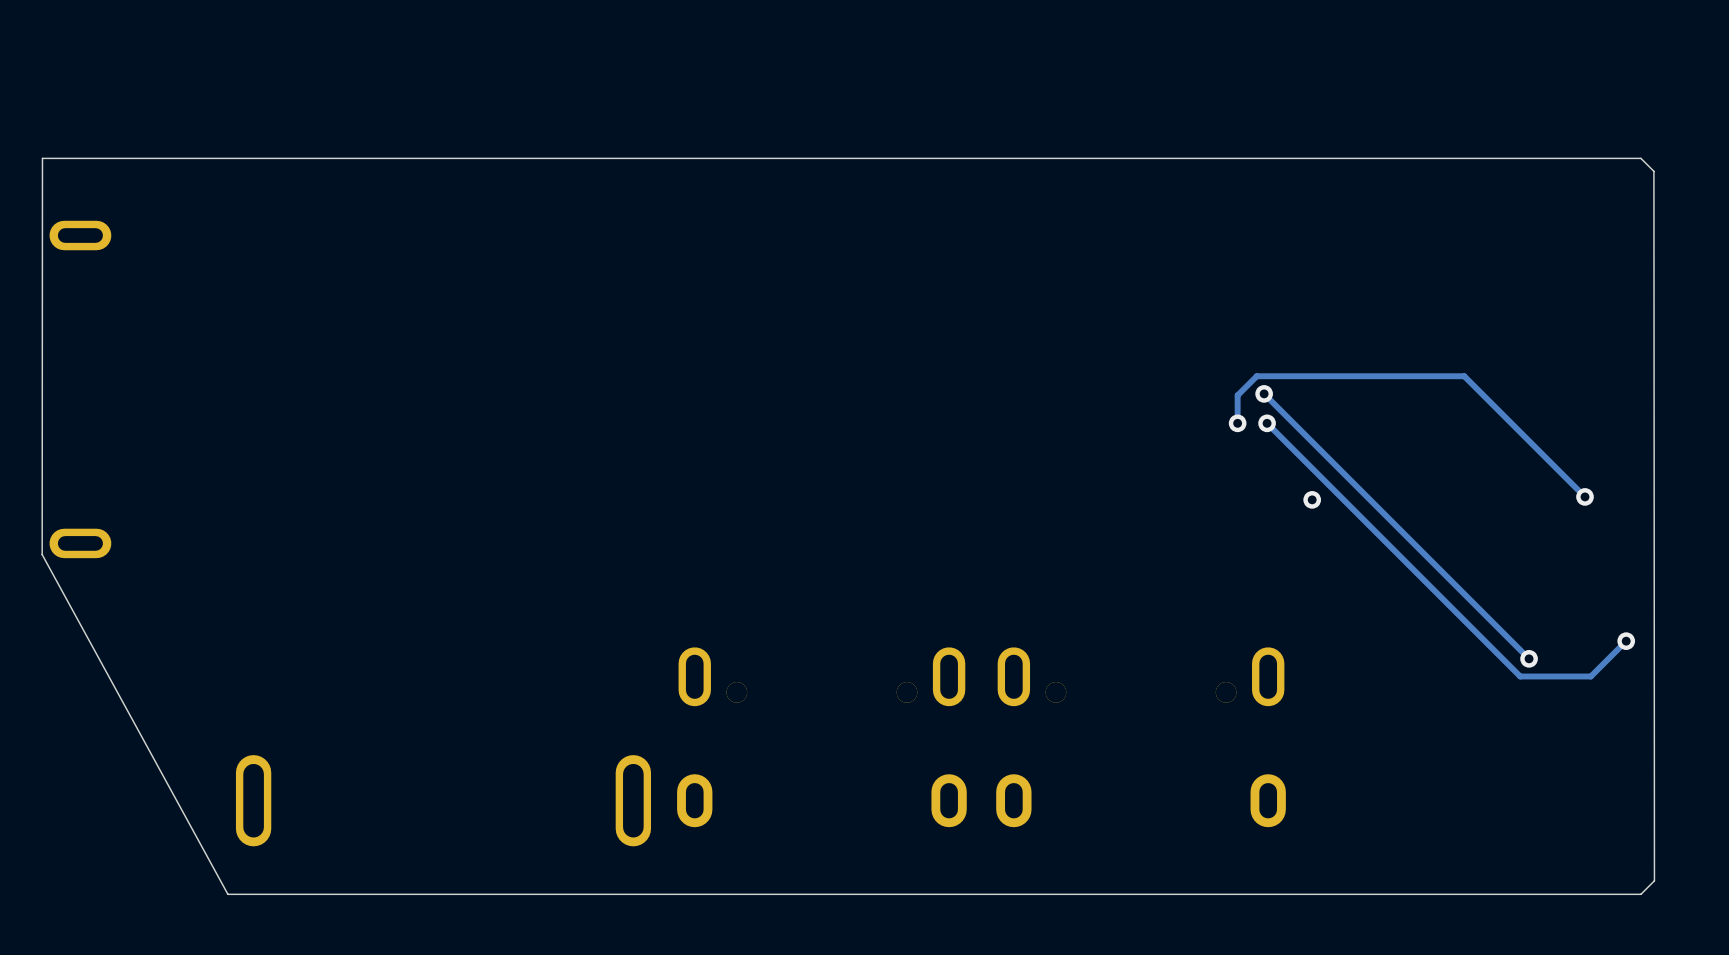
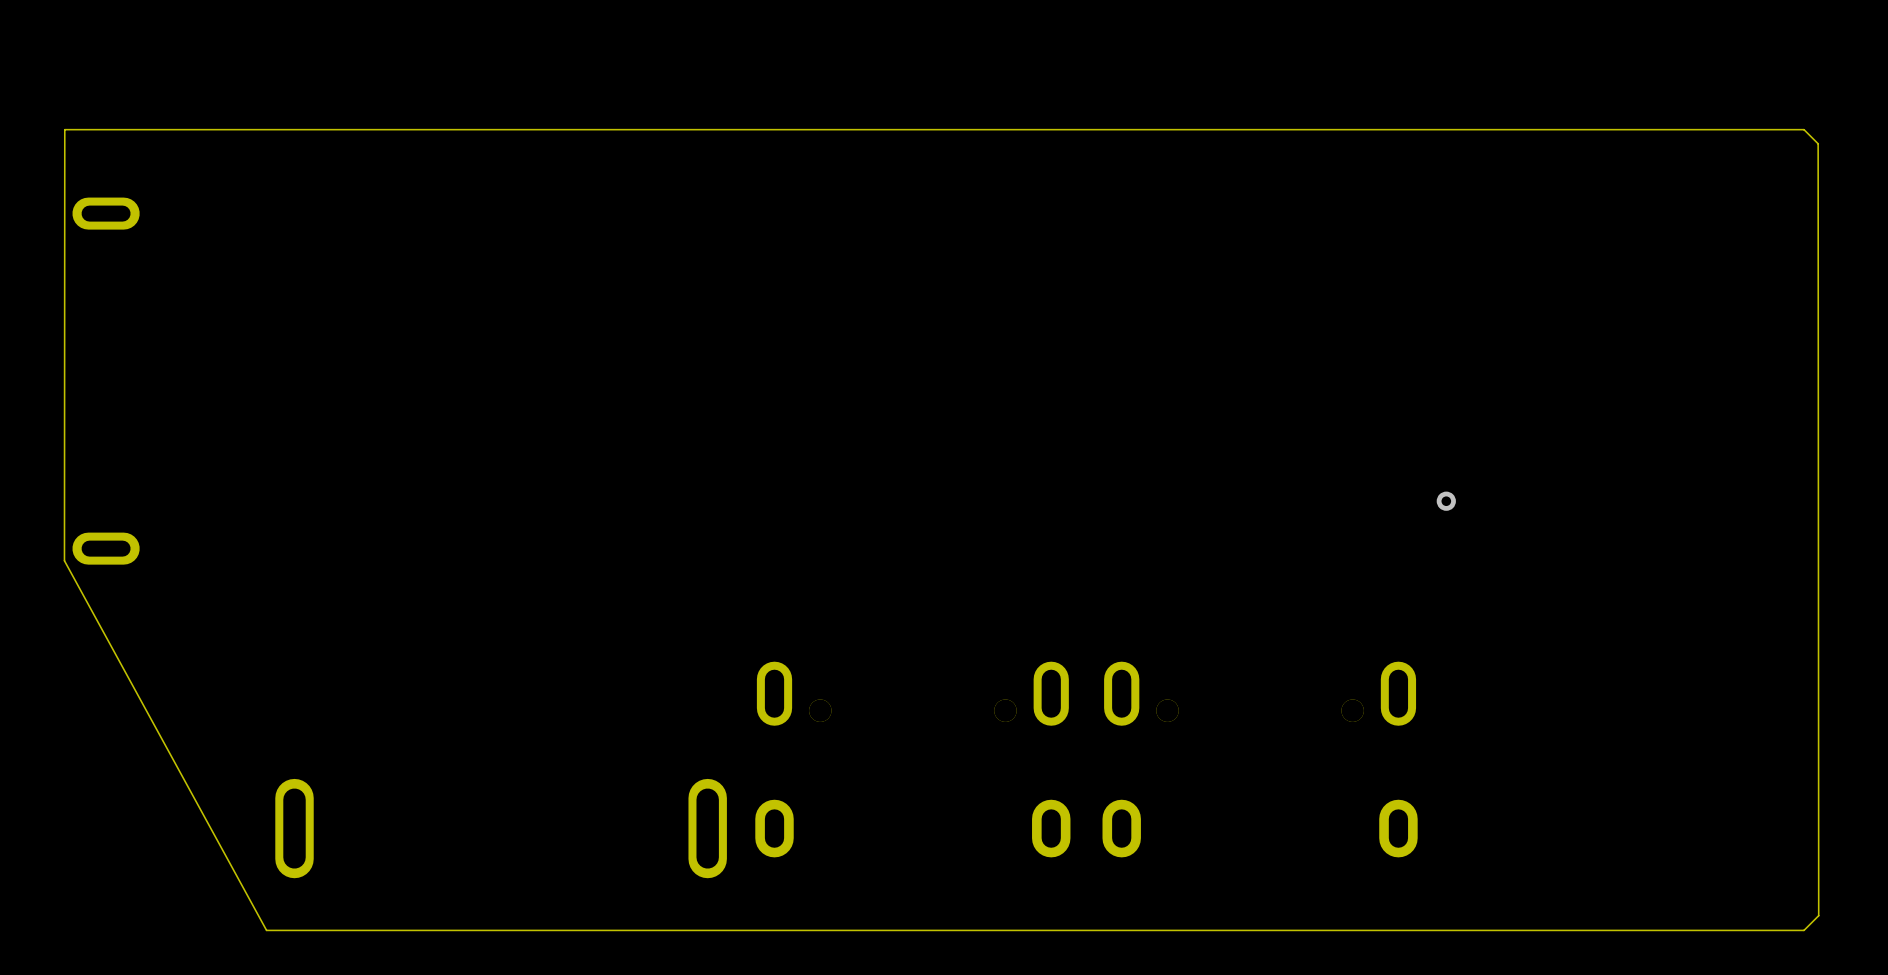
track: (1264, 393) (1529, 658) -> none
via: (1264, 393) -> none
track: (1237, 423) (1237, 395) (1256, 376) (1464, 376) (1585, 496) -> none
via: (1237, 423) -> none
track: (1267, 423) (1520, 676) (1590, 676) (1626, 641) -> none
via: (1267, 423) -> none
via: (1585, 496) -> none
via: (1626, 641) -> none
via: (1529, 658) -> none

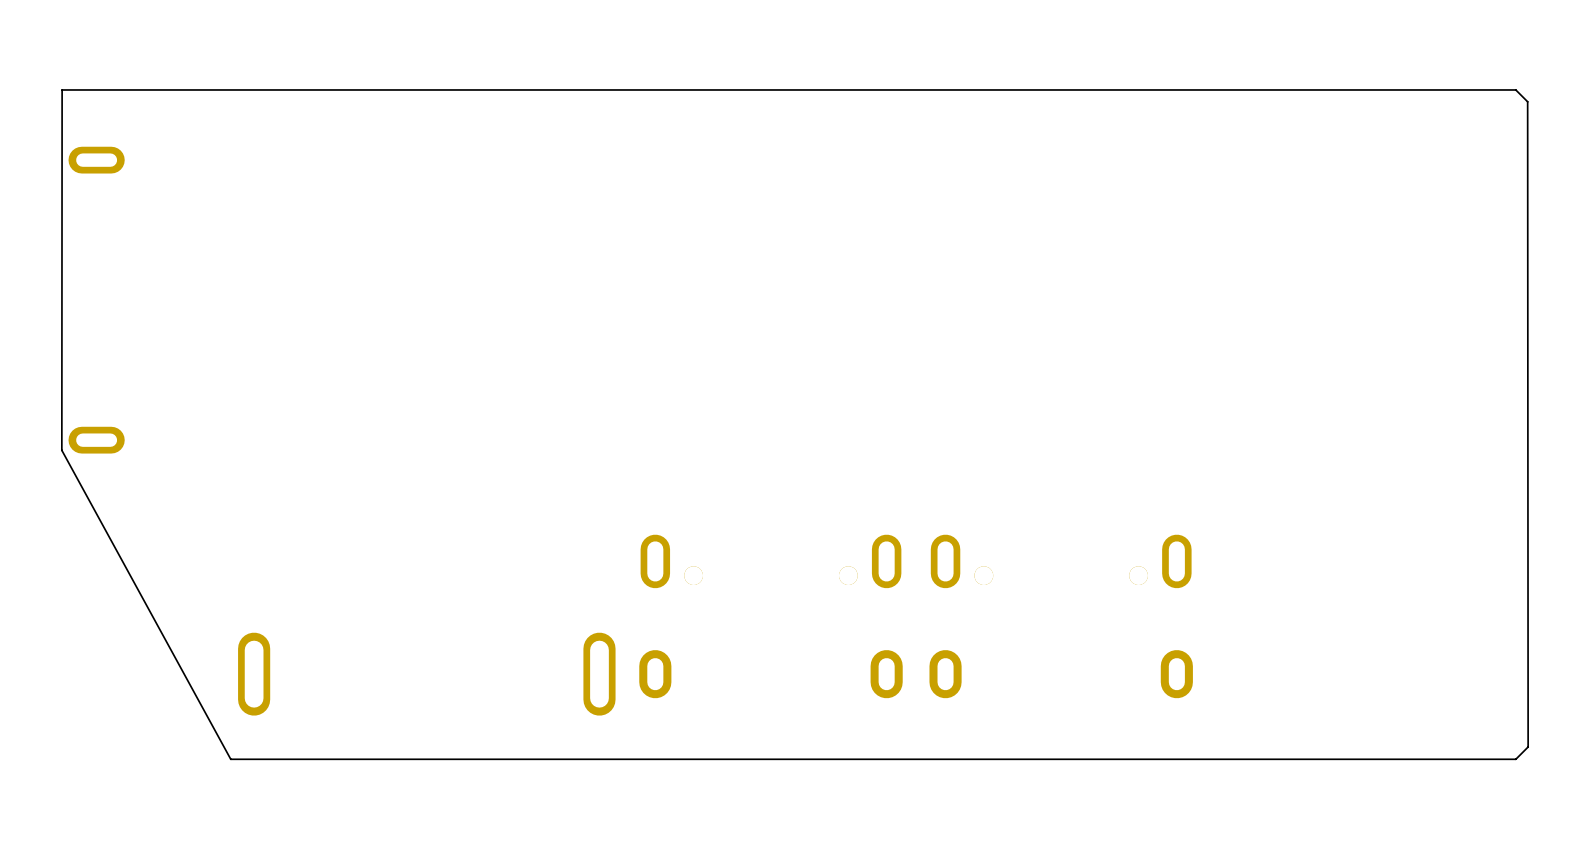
via: (1446, 501) -> none

